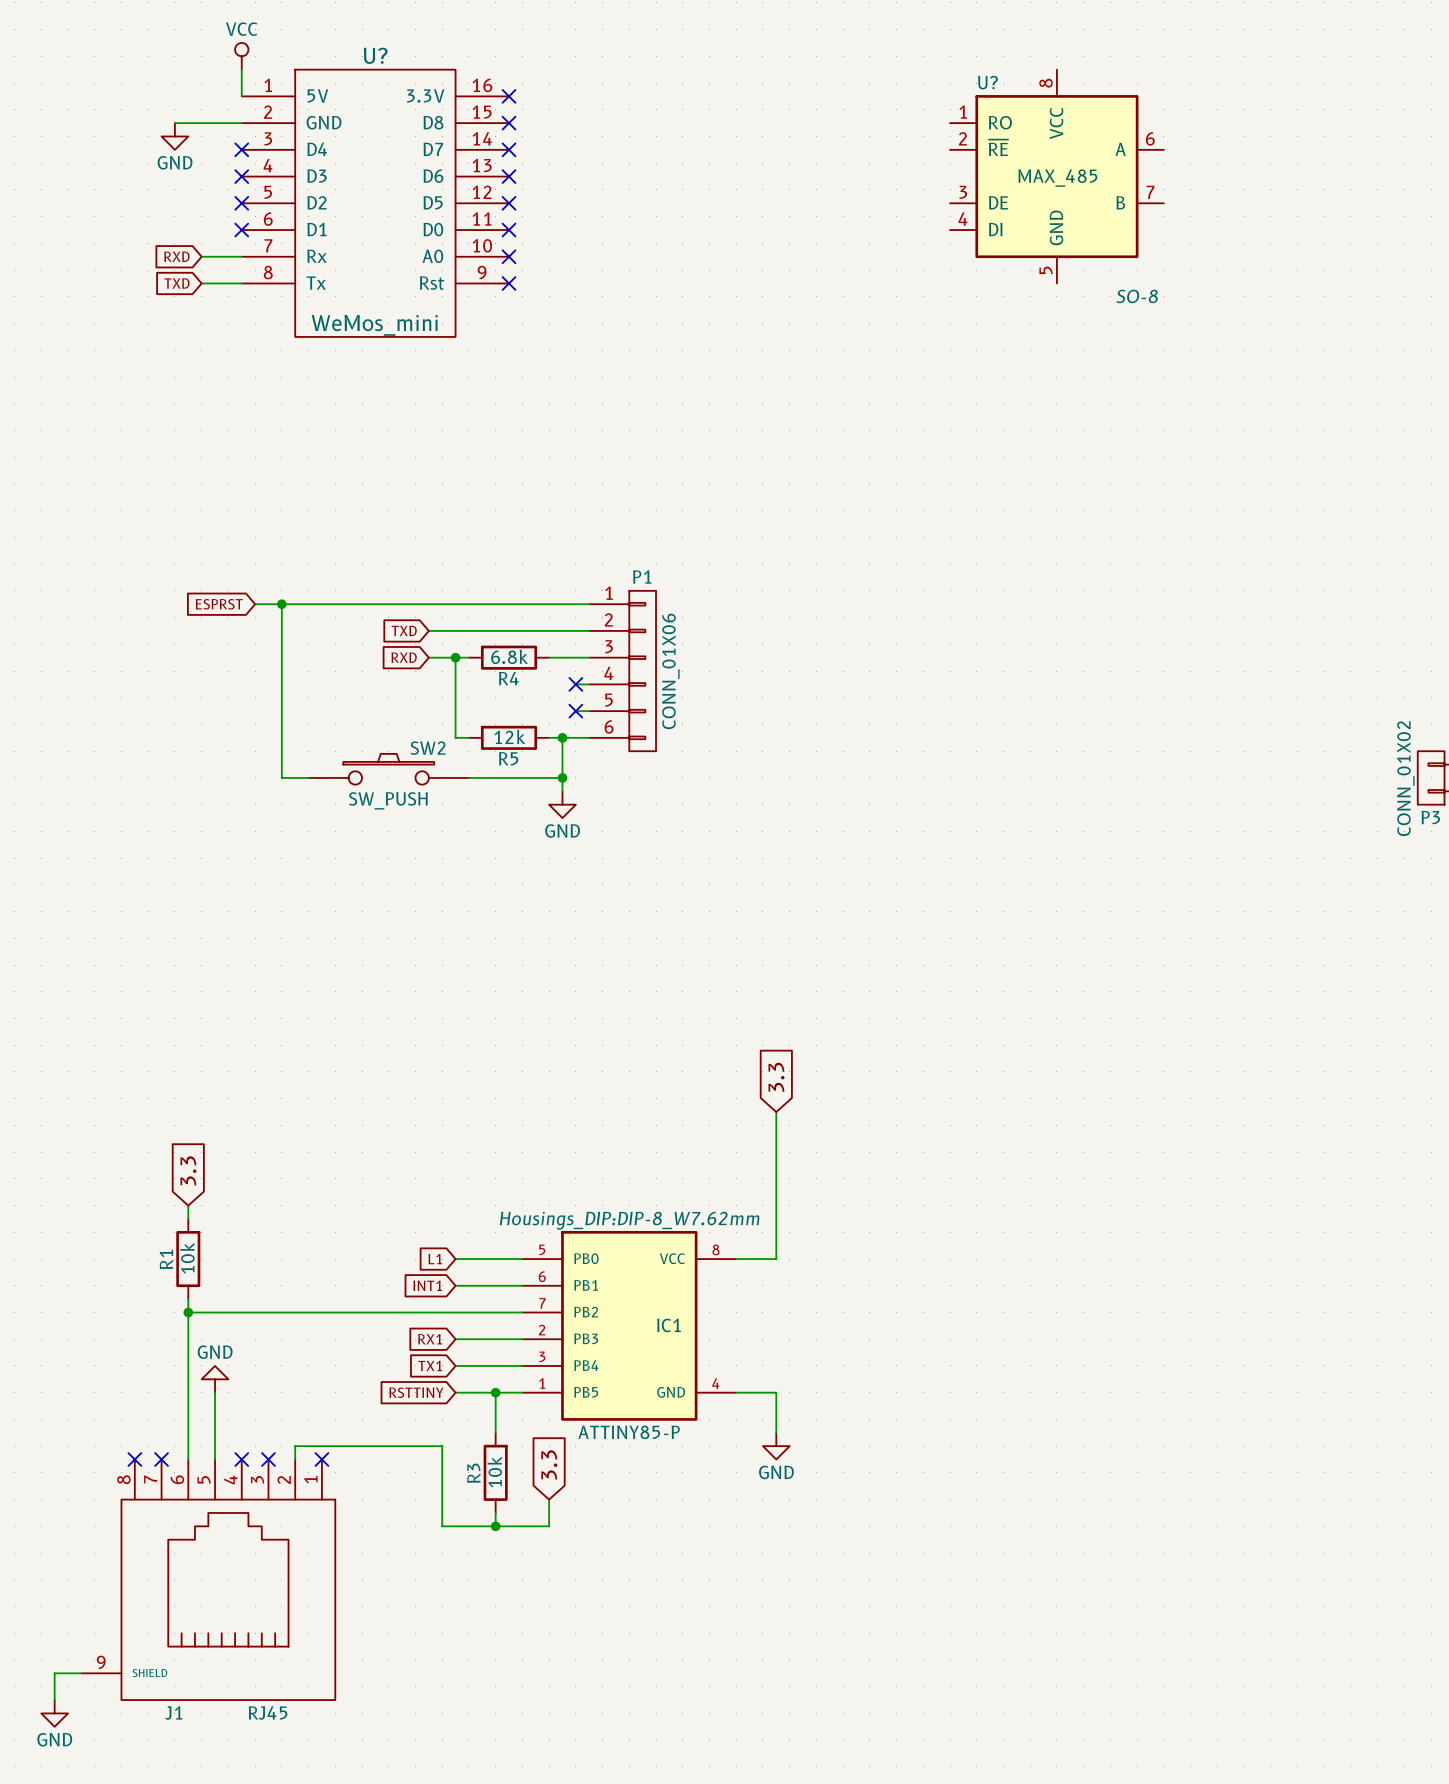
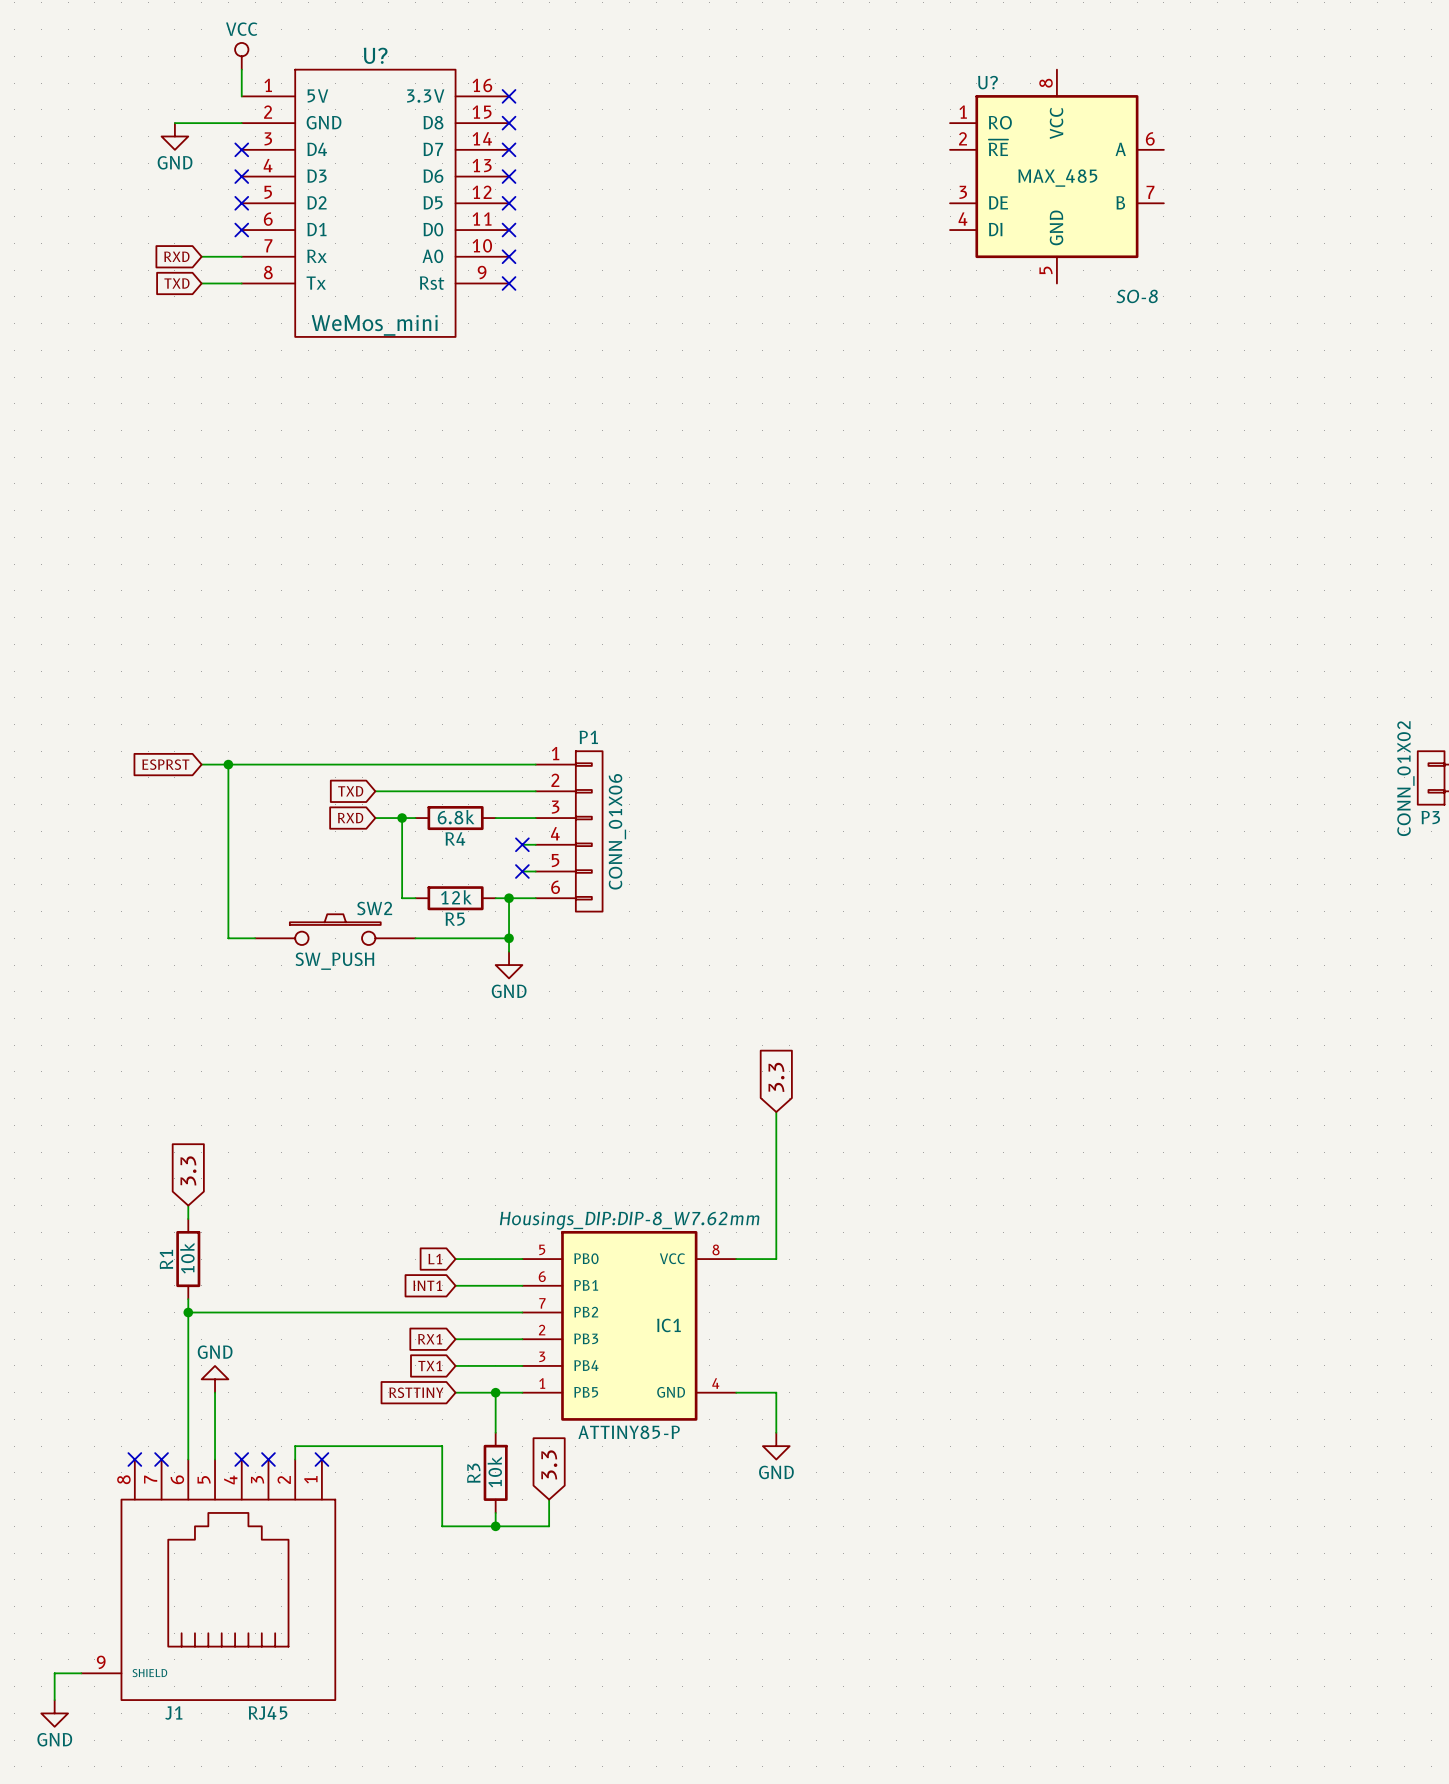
global label position: ESPRST (219, 604) -> ESPRST (165, 764)
wire: (255, 604) (589, 604) -> (201, 764) (535, 764)
wire: (281, 604) (281, 777) (308, 777) -> (228, 764) (228, 938) (255, 938)
junction: (281, 604) -> none
global label position: TXD (404, 630) -> TXD (350, 791)
wire: (428, 630) (589, 630) -> (375, 791) (535, 791)
global label position: RXD (404, 657) -> RXD (350, 818)
wire: (428, 657) (468, 657) -> (375, 818) (415, 818)
wire: (455, 657) (455, 737) (468, 737) -> (402, 818) (402, 898) (415, 898)
junction: (455, 657) -> none
R4 position: (509, 657) -> (455, 818)
wire: (549, 657) (589, 657) -> (495, 818) (535, 818)
P1 position: (622, 671) -> (569, 831)
wire: (575, 684) (589, 684) -> (522, 844) (535, 844)
no-connect mark: (575, 684) -> none
wire: (575, 711) (589, 711) -> (522, 871) (535, 871)
no-connect mark: (575, 711) -> none
R5 position: (509, 737) -> (455, 898)
wire: (549, 737) (589, 737) -> (495, 898) (535, 898)
wire: (562, 737) (562, 791) -> (509, 898) (509, 951)
junction: (562, 737) -> none
junction: none -> (228, 764)
SW2 position: (388, 769) -> (335, 929)
wire: (468, 777) (562, 777) -> (415, 938) (509, 938)
junction: (562, 777) -> none
power symbol position: GND (562, 804) -> GND (509, 965)
junction: none -> (402, 818)
no-connect mark: none -> (522, 844)
no-connect mark: none -> (522, 871)
junction: none -> (509, 898)
junction: none -> (509, 938)

